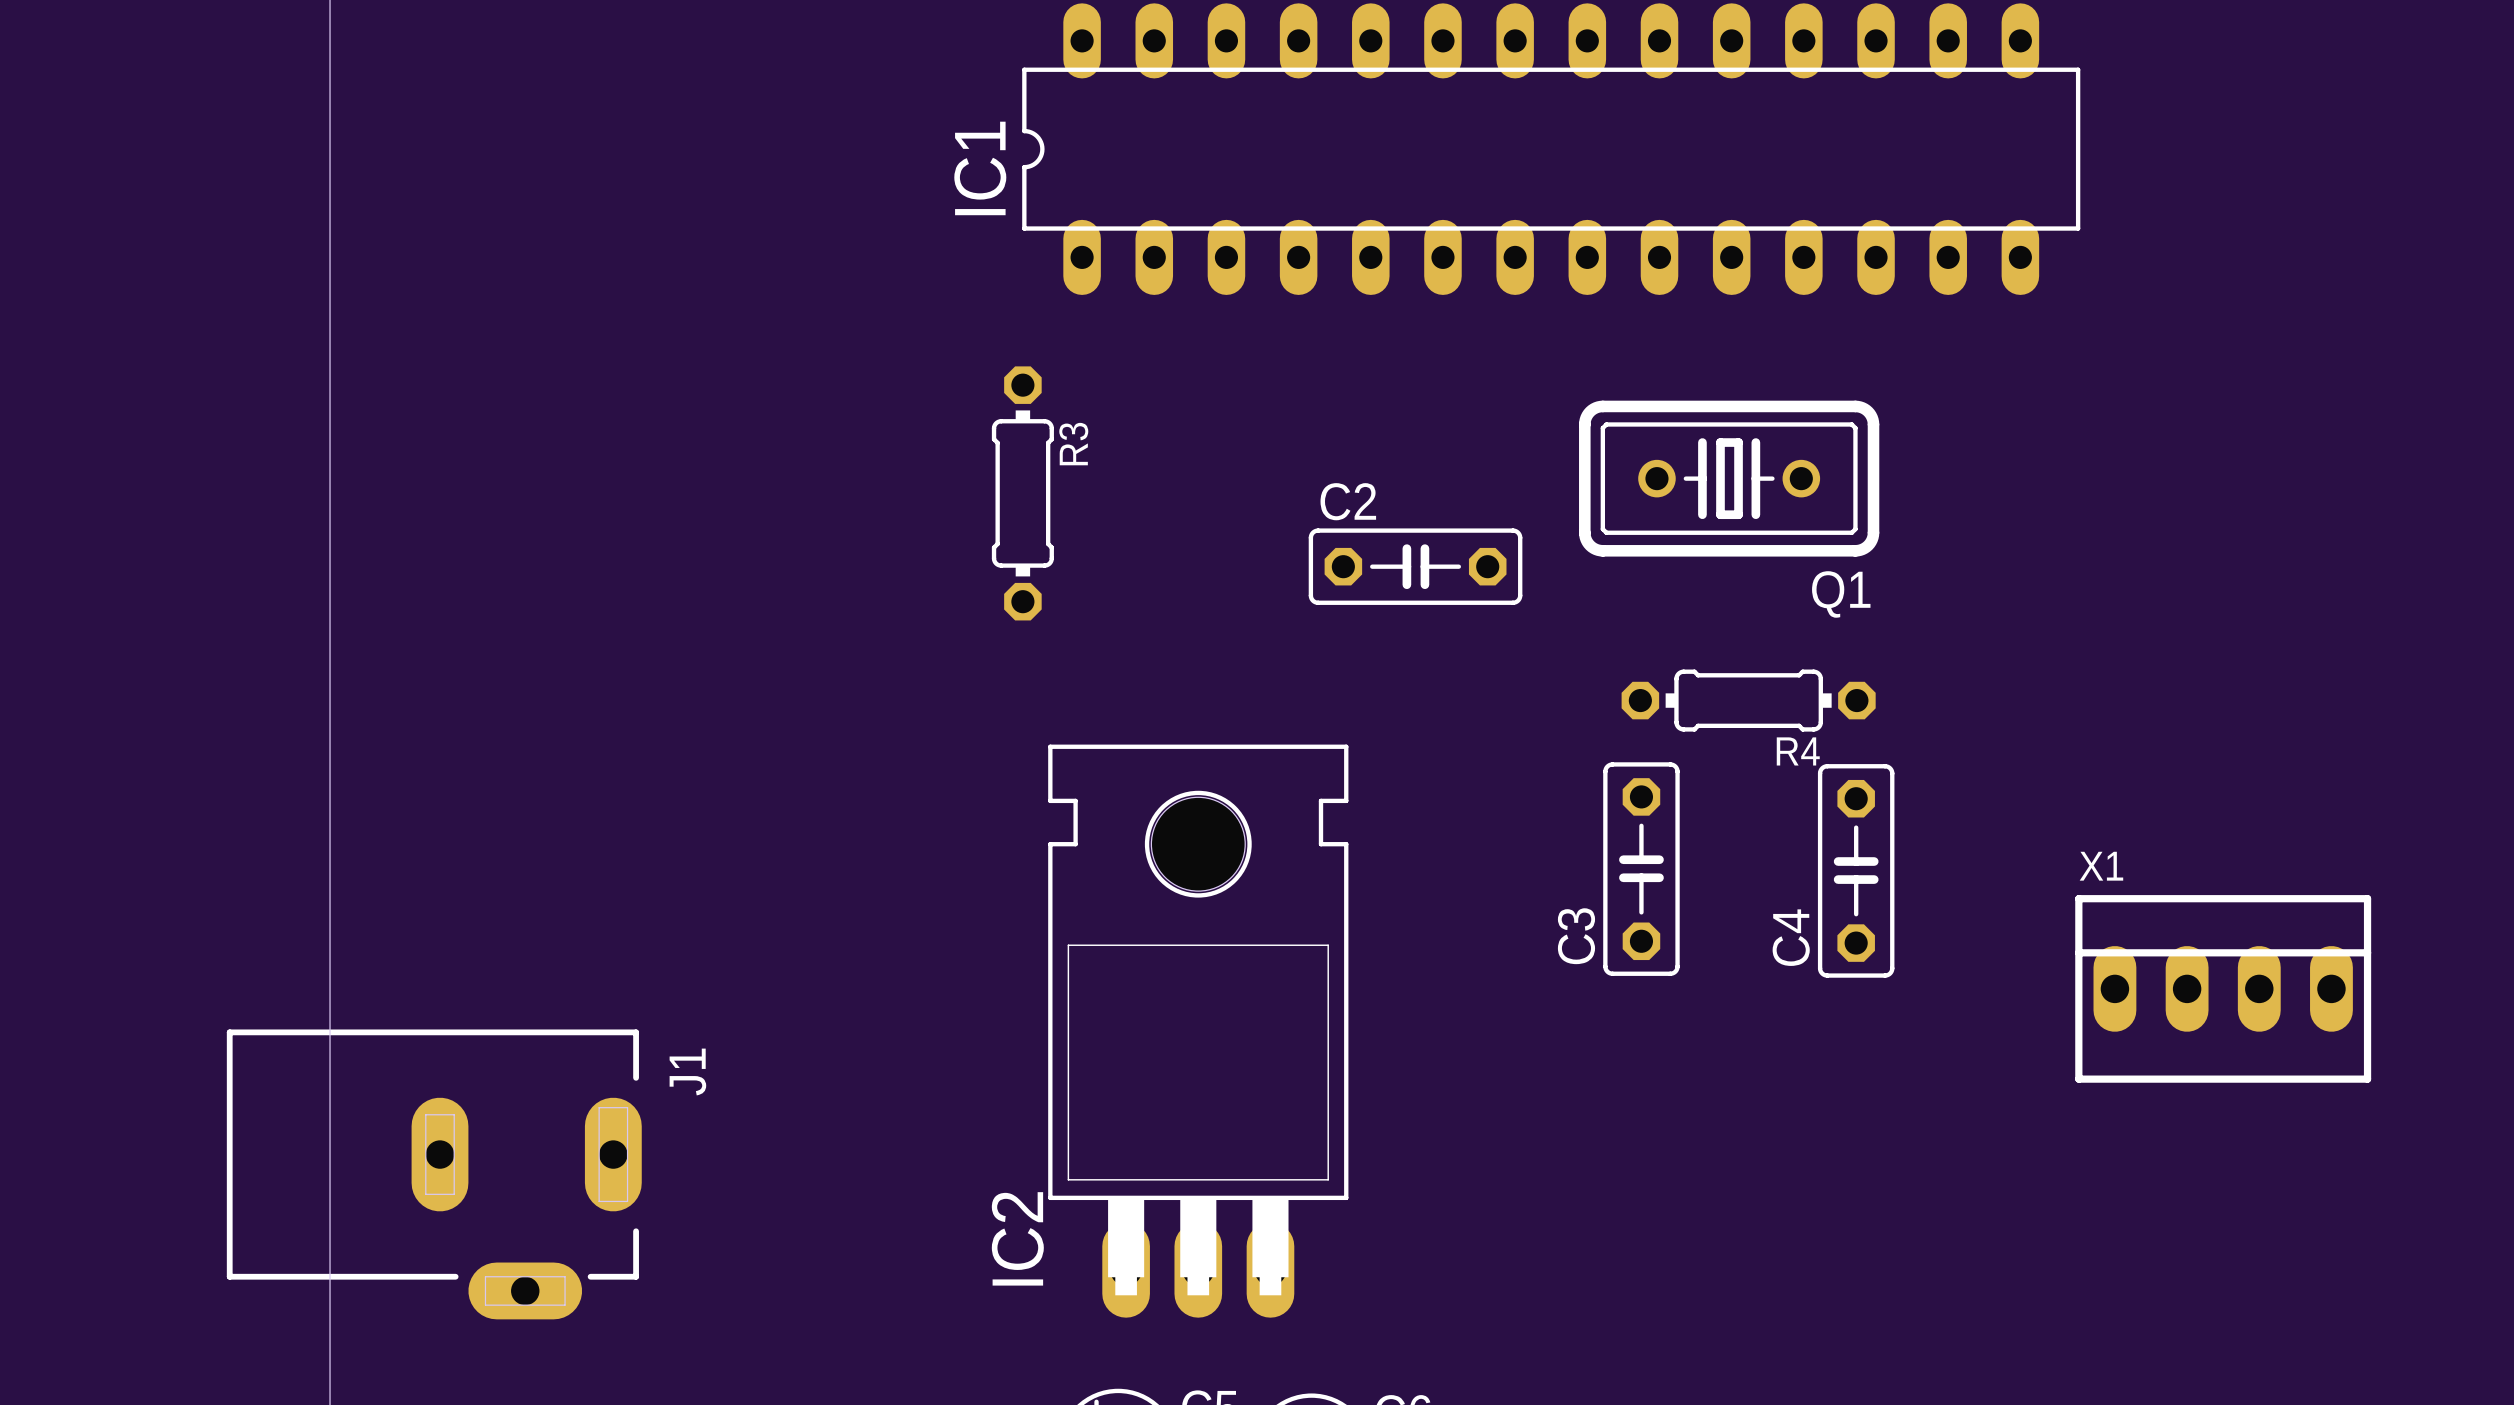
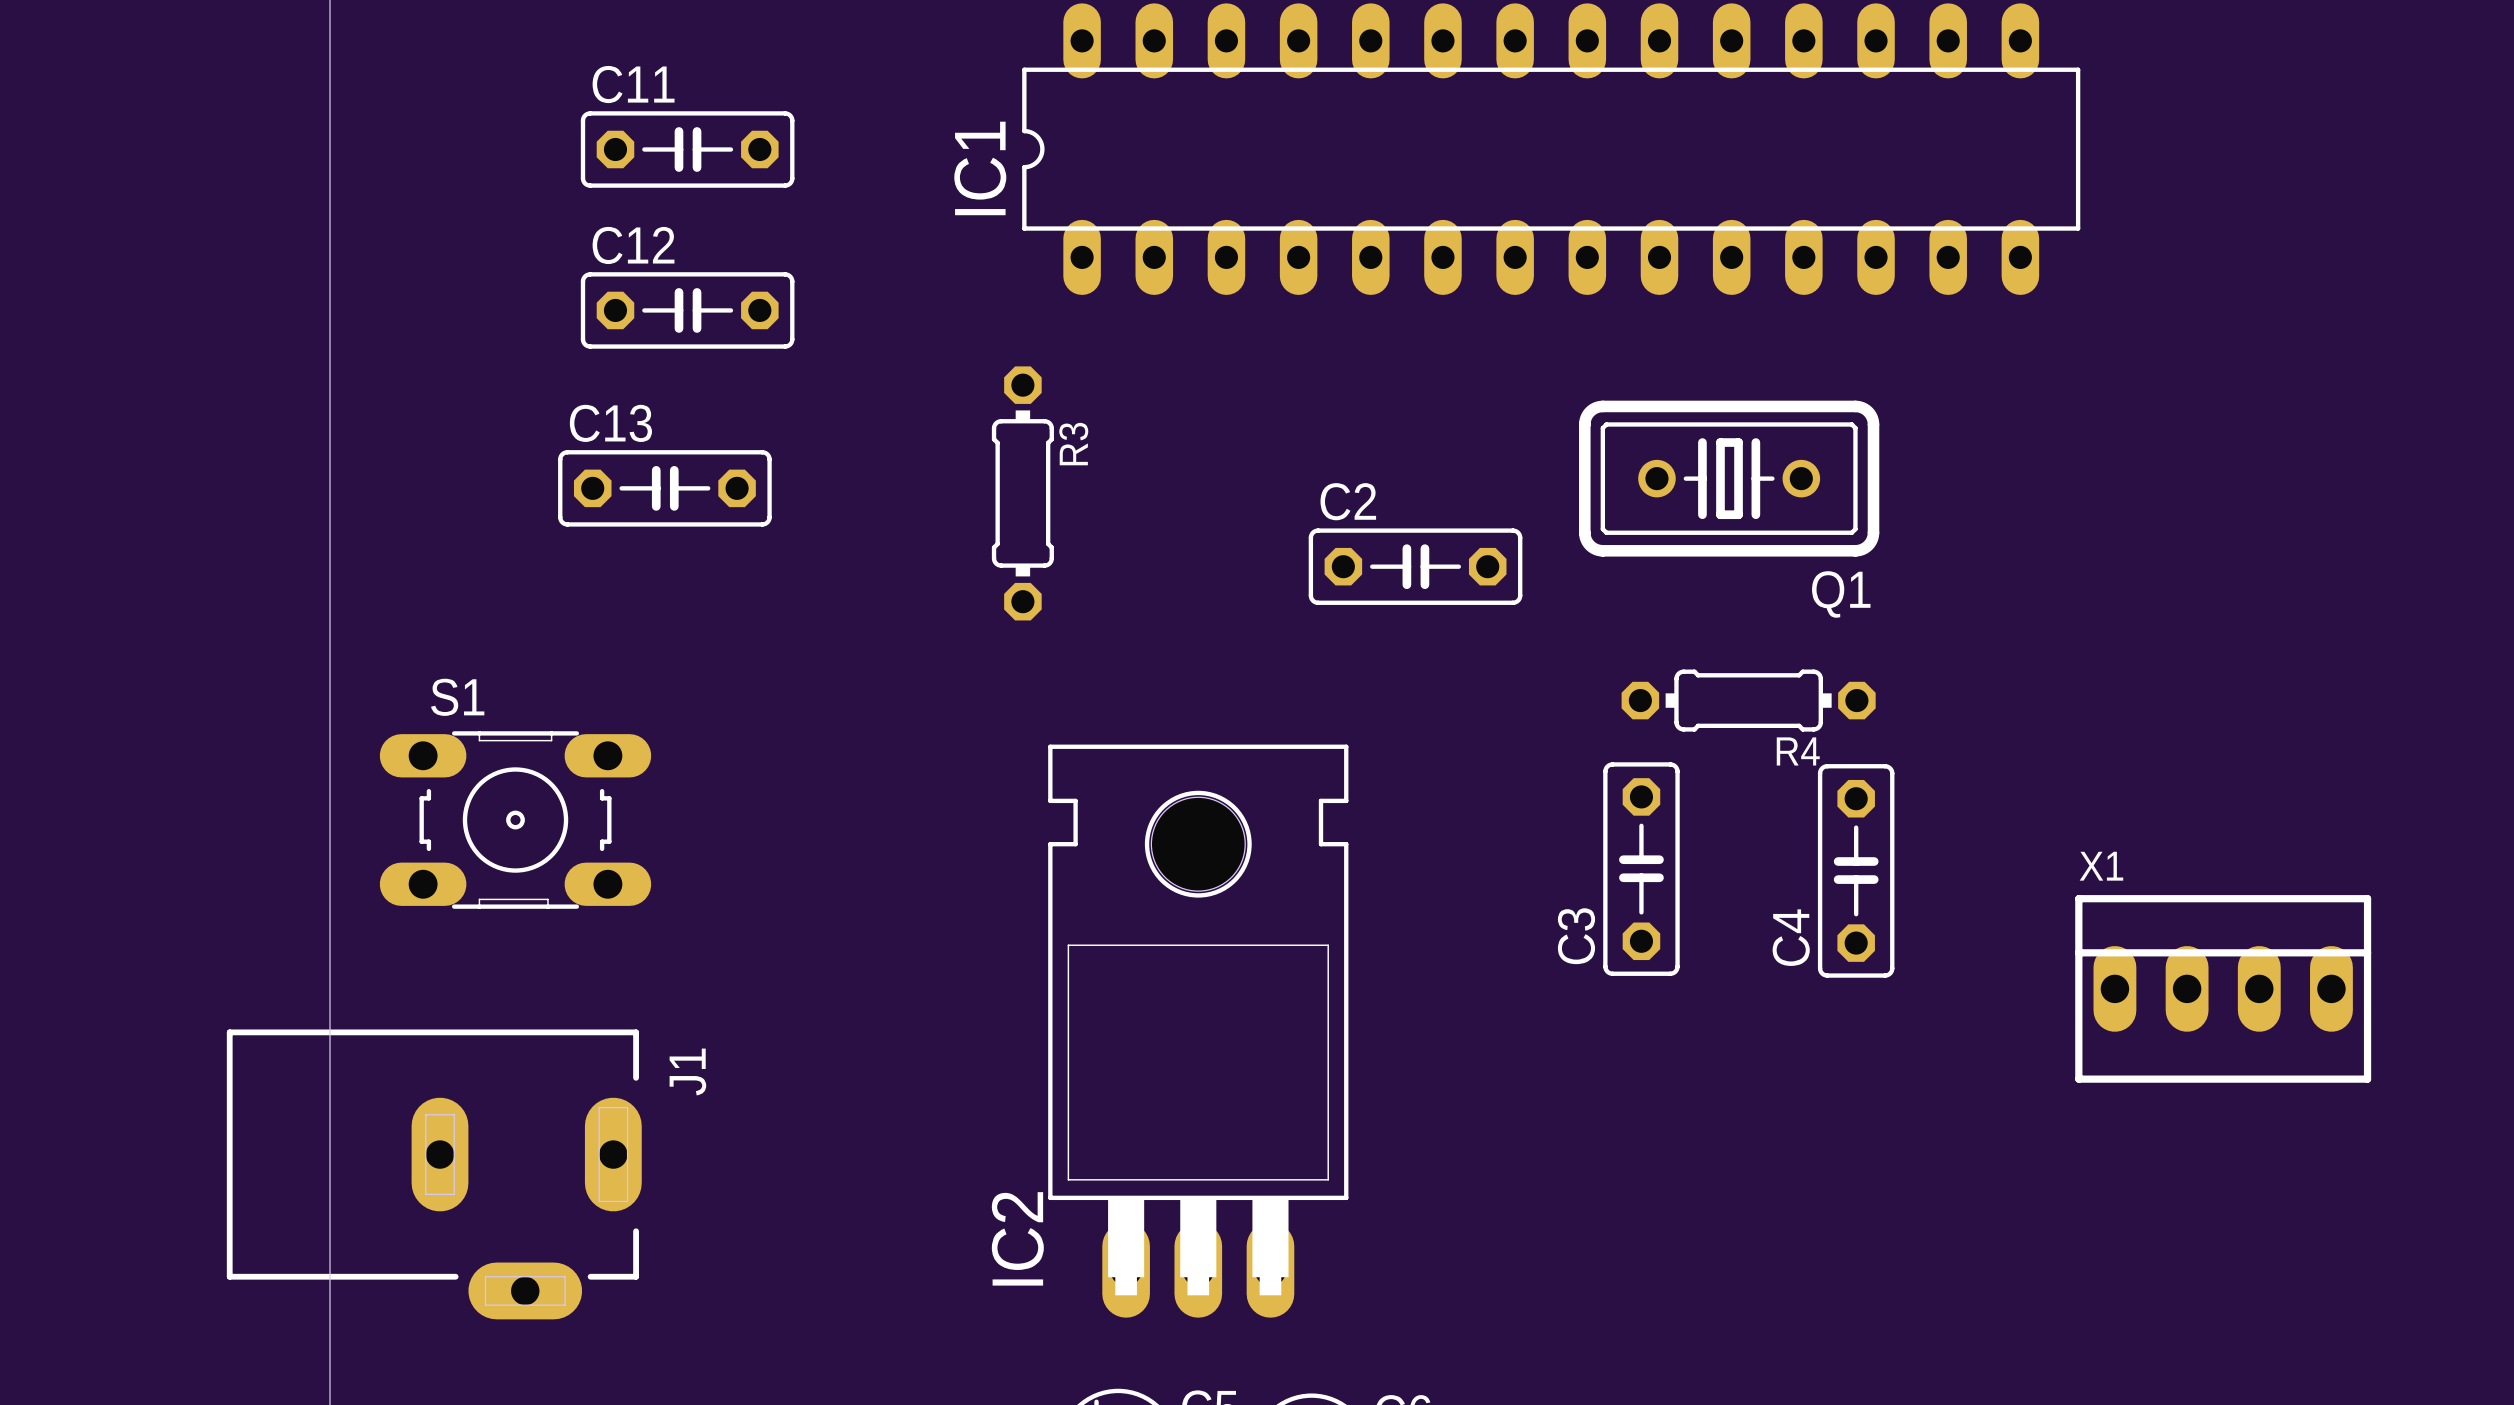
C11: none -> (687, 149)
C12: none -> (687, 310)
C13: none -> (664, 488)
S1: none -> (515, 820)

